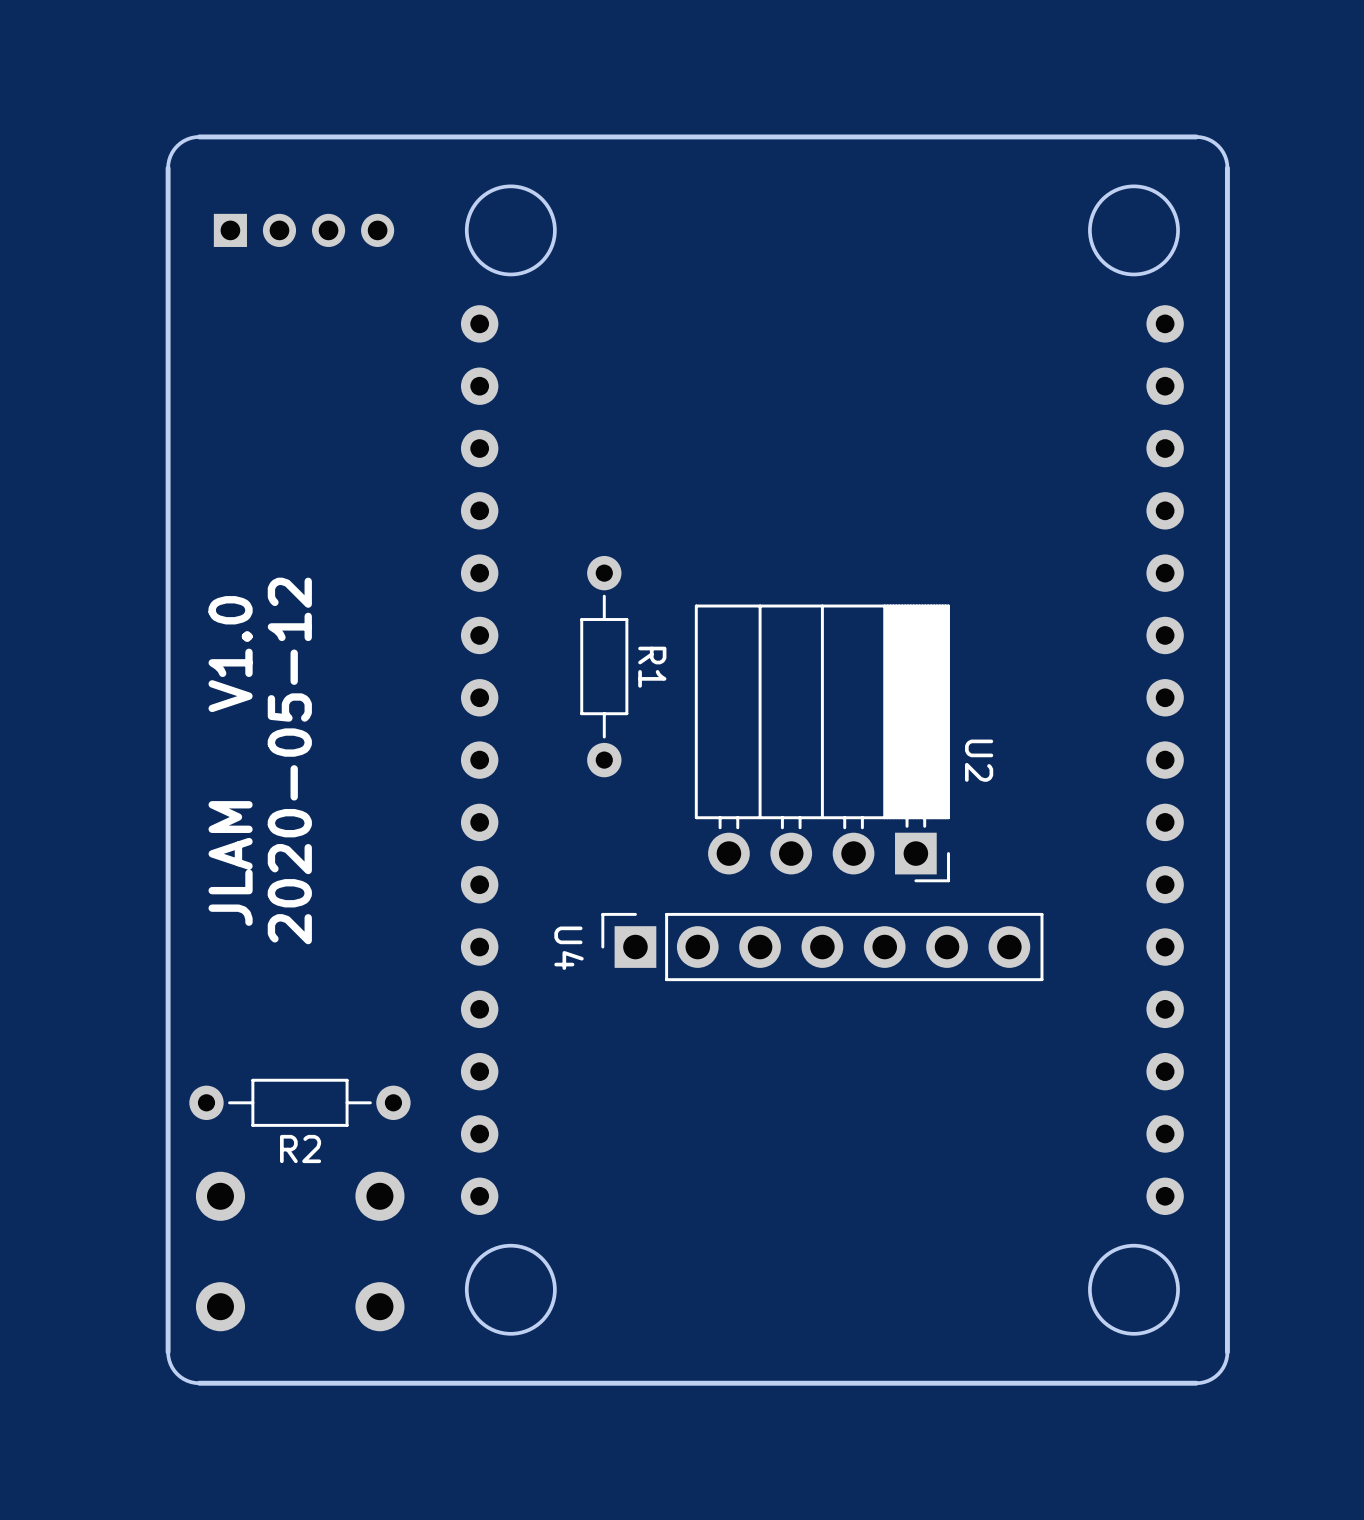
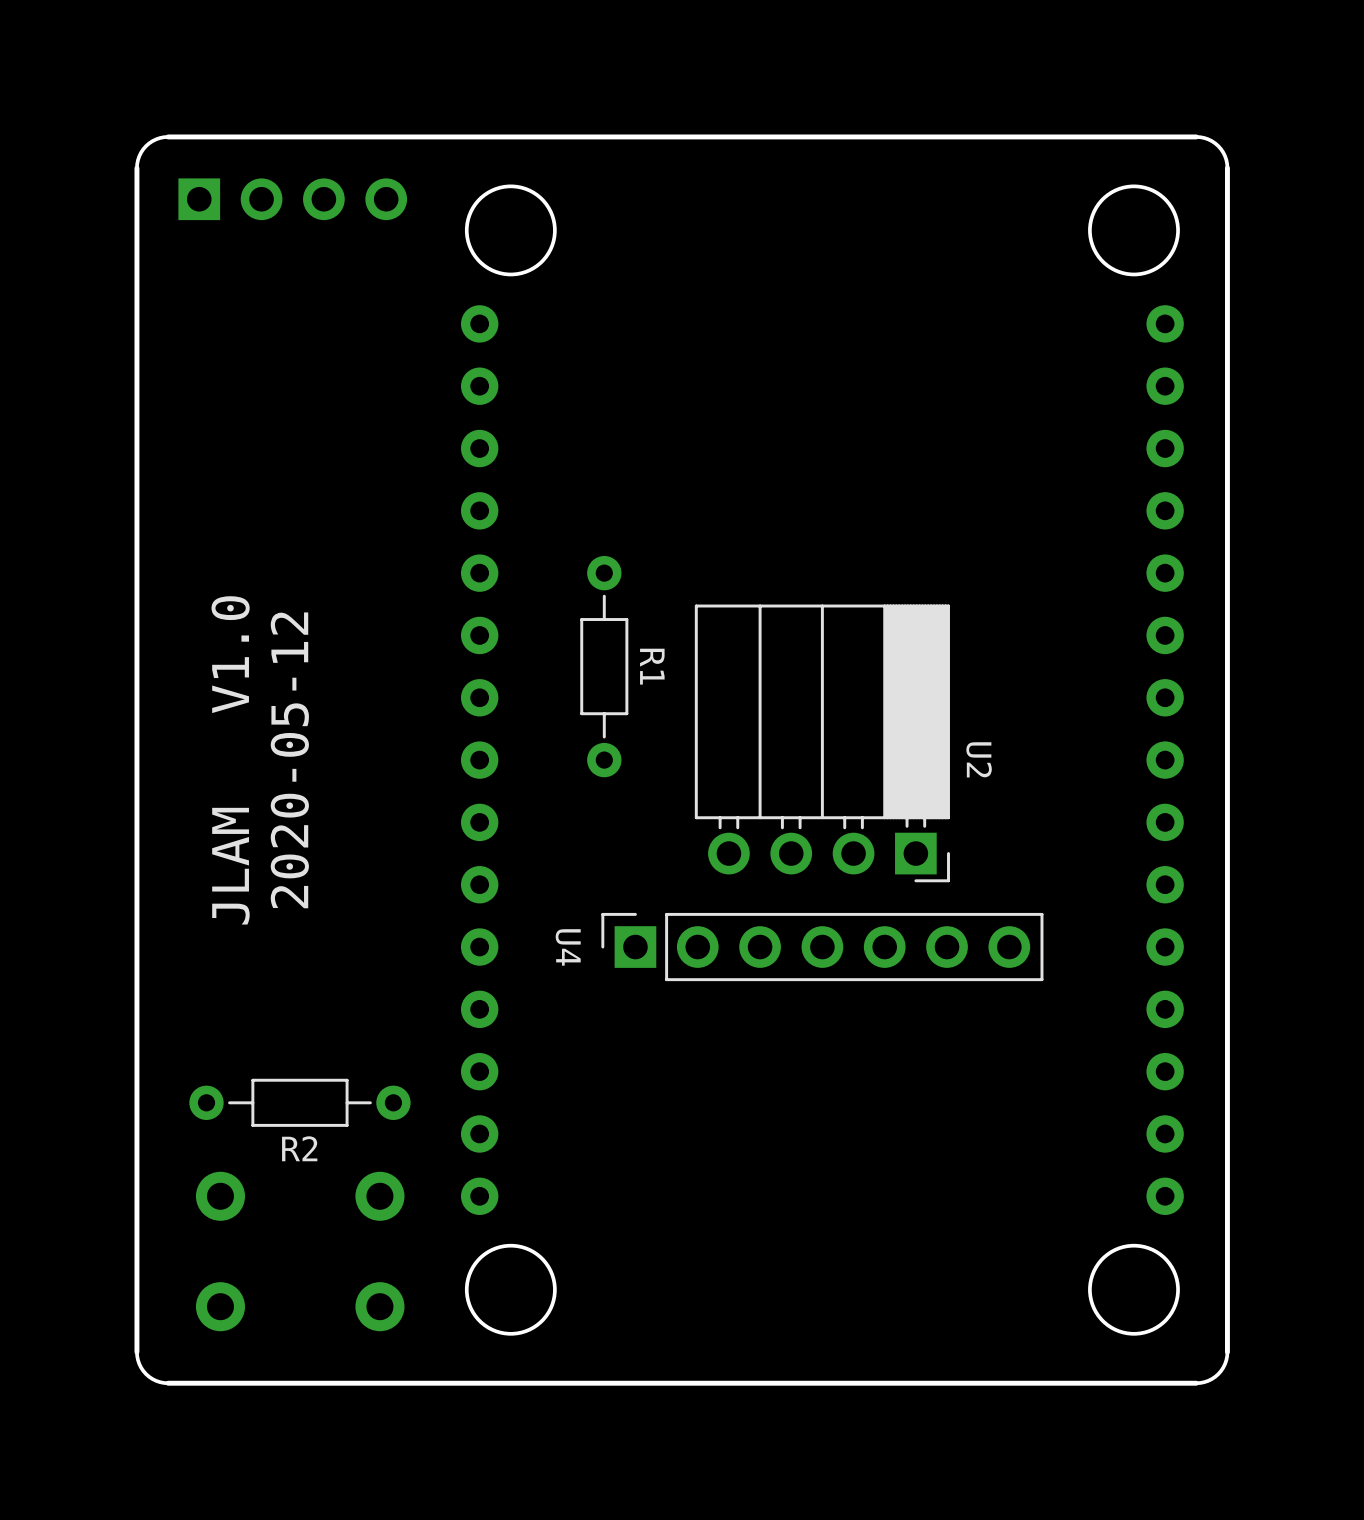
board edge: (199, 136) (187, 139) (177, 146) (170, 156) (168, 168) (168, 1352) (170, 1364) (177, 1374) (187, 1380) (199, 1383) -> (199, 136) (164, 137) (152, 141) (141, 152) (136, 168) (136, 1352) (141, 1367) (152, 1379) (164, 1382) (199, 1383)
part: none -> (292, 199)
part: (304, 230) -> none

